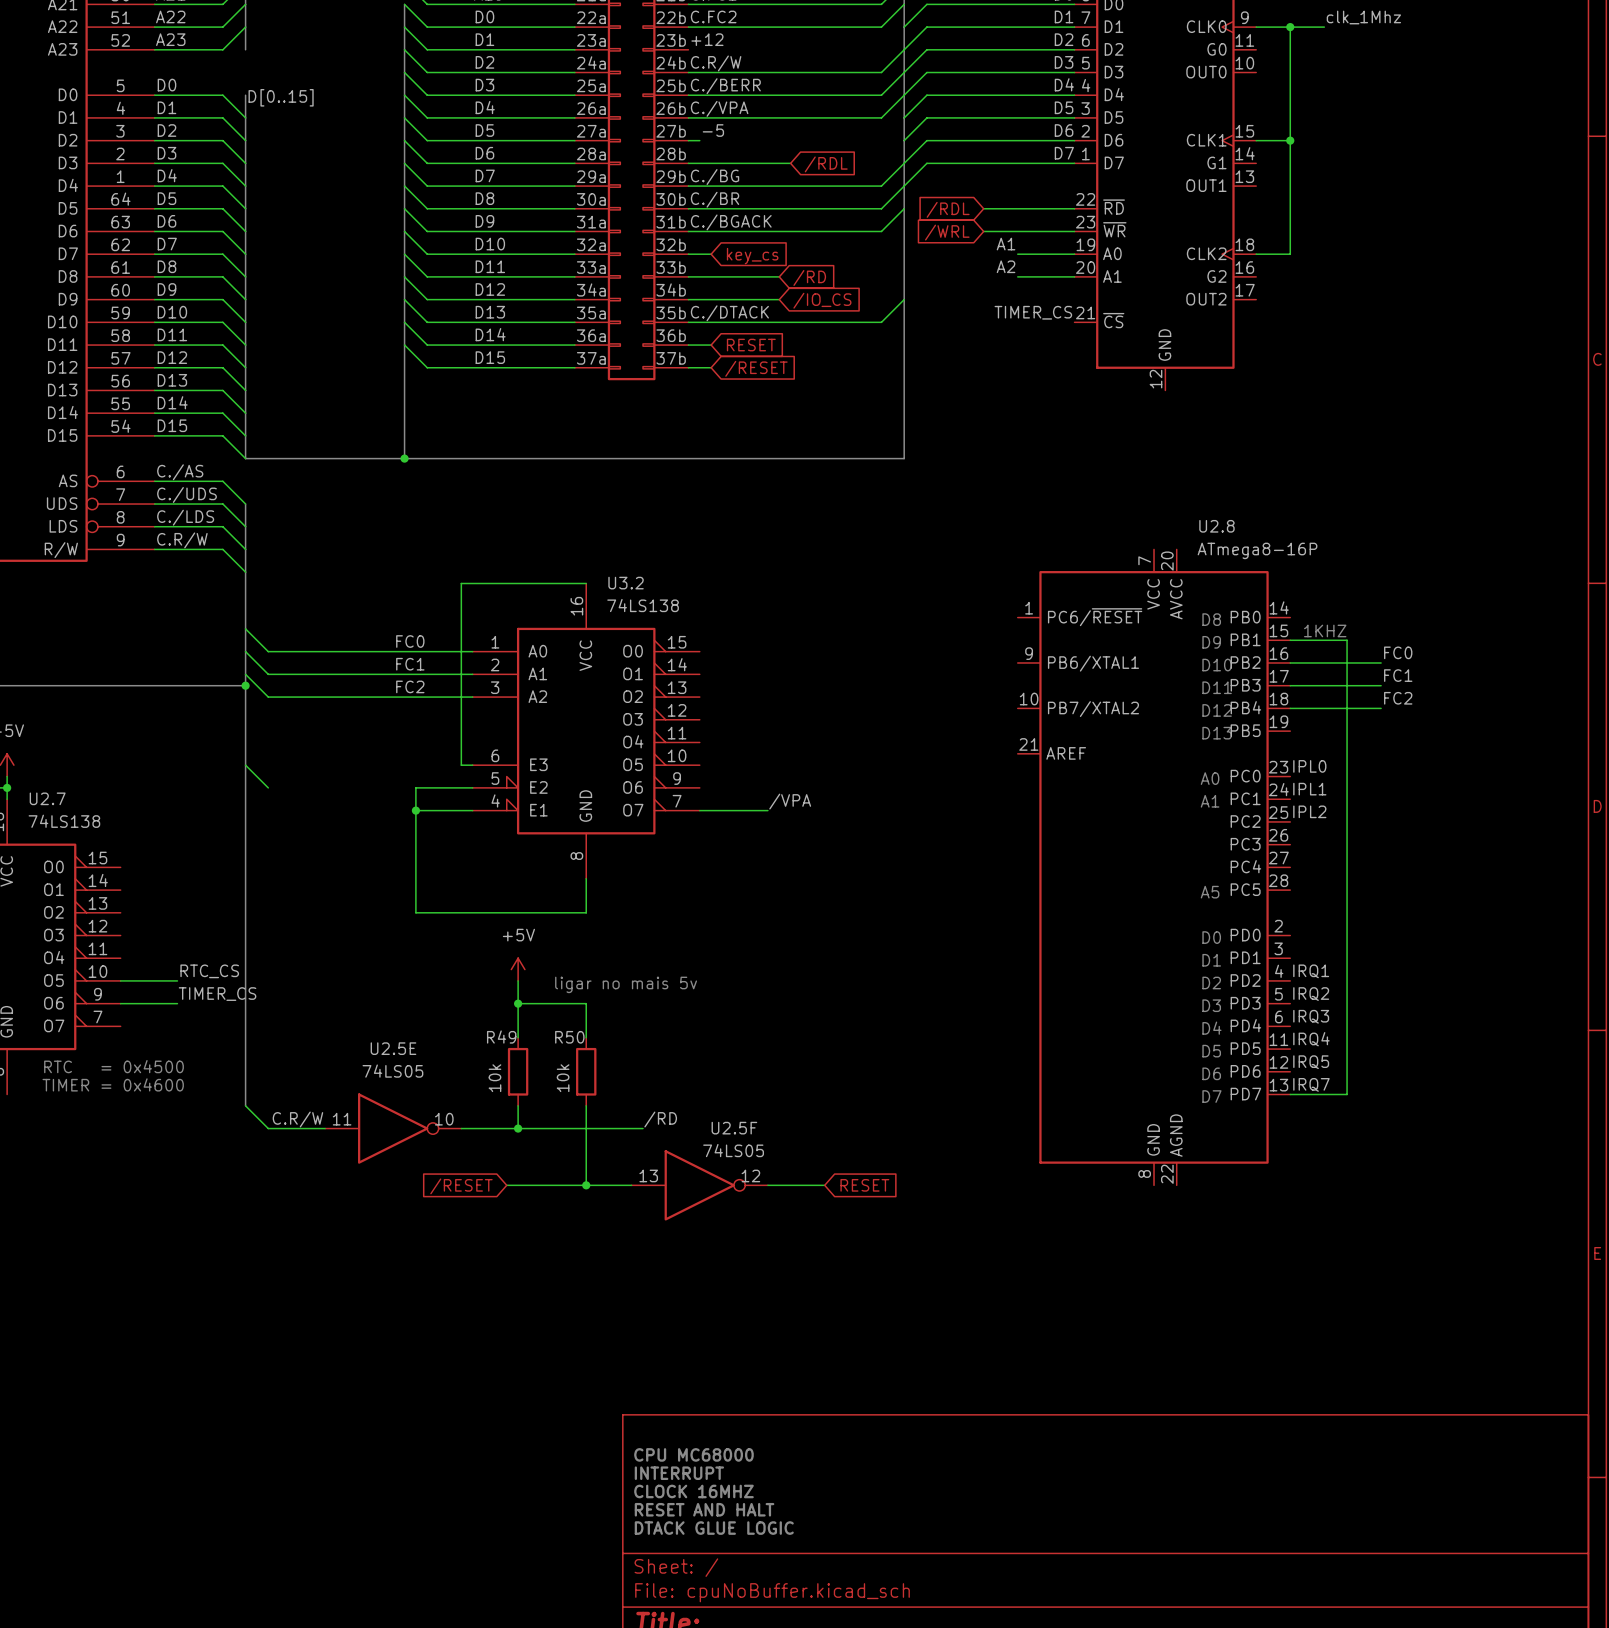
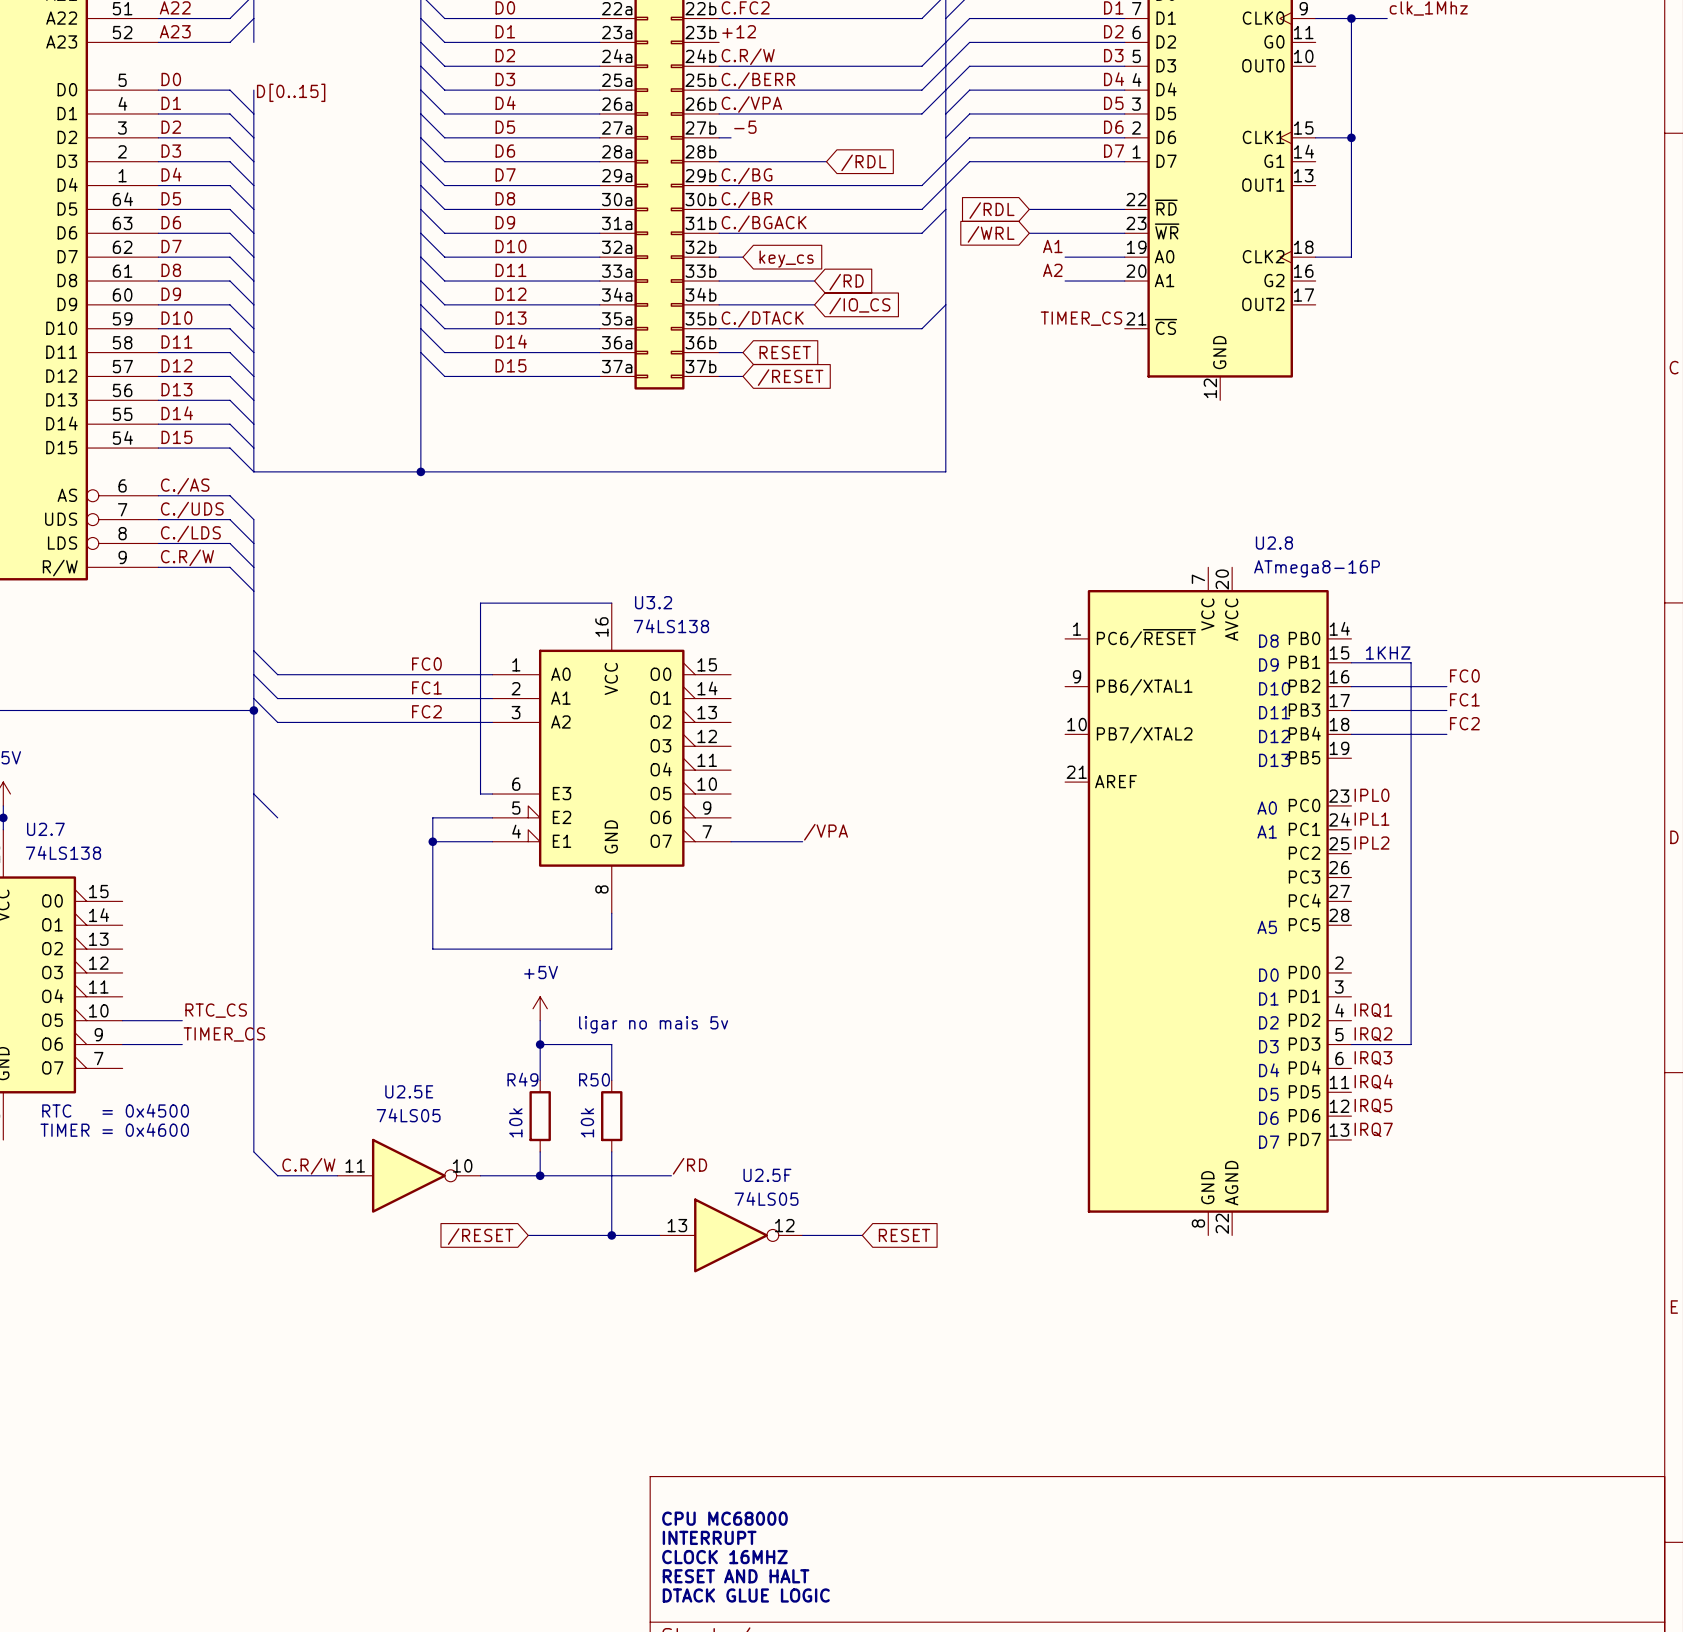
wire: (1347, 1003) (1347, 1094) (1290, 1094) -> (1411, 1044) (1351, 1044)

